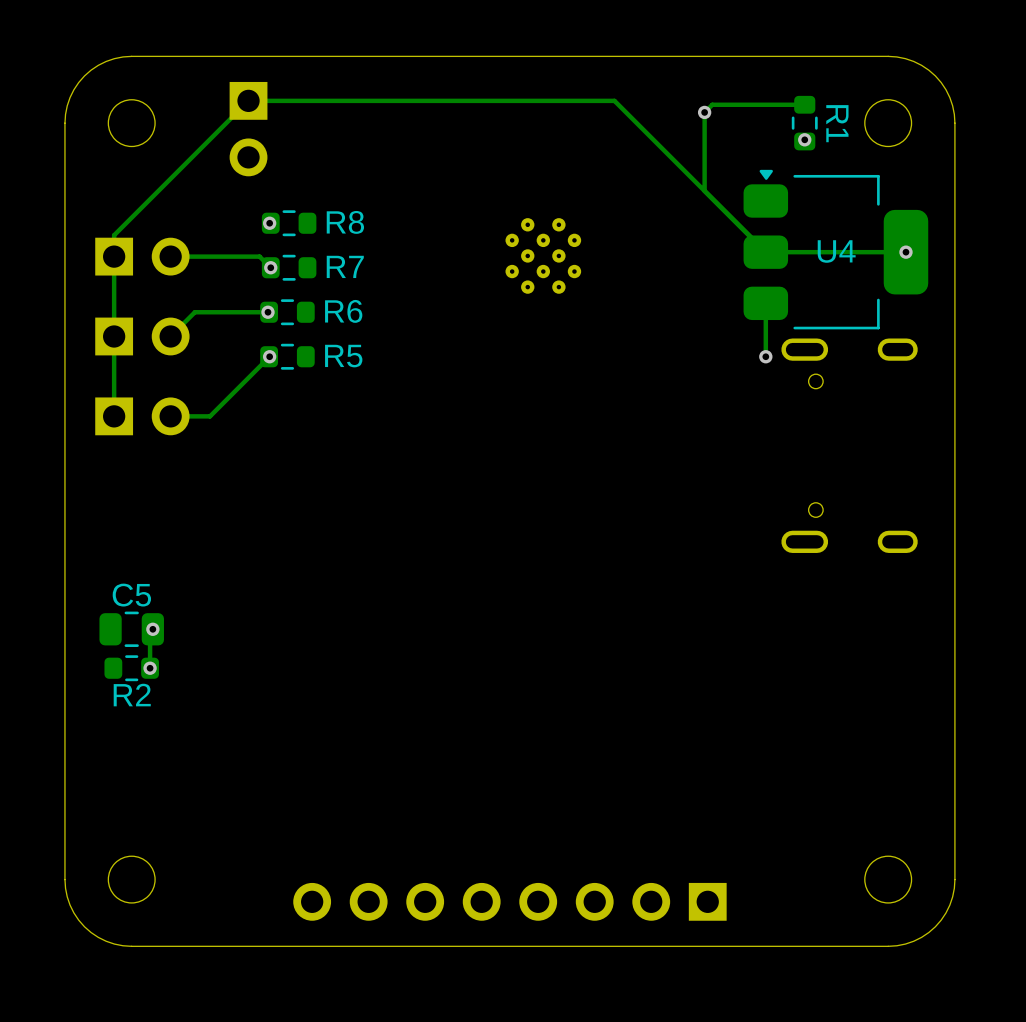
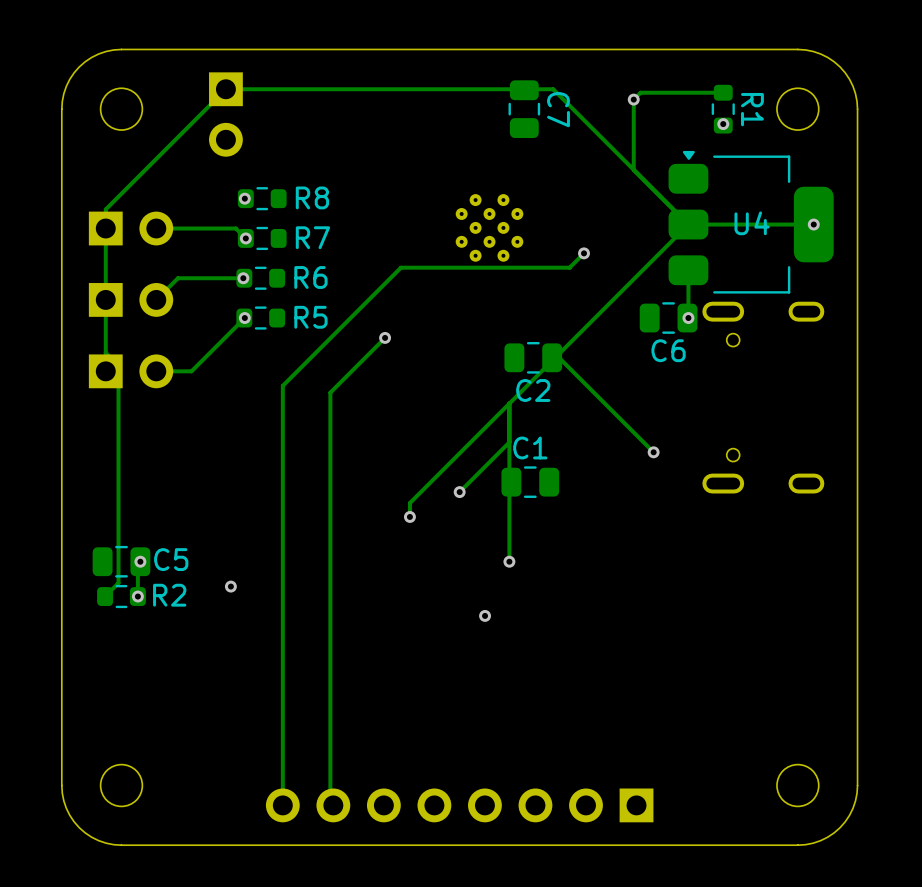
C7: none -> (524, 109)
track: none -> (688, 224) (409, 503) (409, 516)
track: none -> (584, 253) (569, 267) (400, 267) (282, 385) (282, 805)
via: none -> (584, 253)
C6: none -> (668, 318)
track: none -> (385, 337) (330, 392) (330, 802) (333, 805)
via: none -> (385, 337)
track: none -> (105, 352) (118, 365) (118, 583) (105, 596)
C2: none -> (533, 357)
track: none -> (552, 357) (557, 355) (653, 452)
track: none -> (509, 403) (509, 561)
track: none -> (509, 442) (459, 492)
via: none -> (653, 452)
C1: none -> (530, 482)
via: none -> (459, 492)
via: none -> (409, 516)
C5 name position: C5 (131, 595) -> C5 (171, 559)
via: none -> (509, 561)
via: none -> (230, 586)
via: none -> (485, 615)
R2 name position: R2 (132, 695) -> R2 (169, 595)

